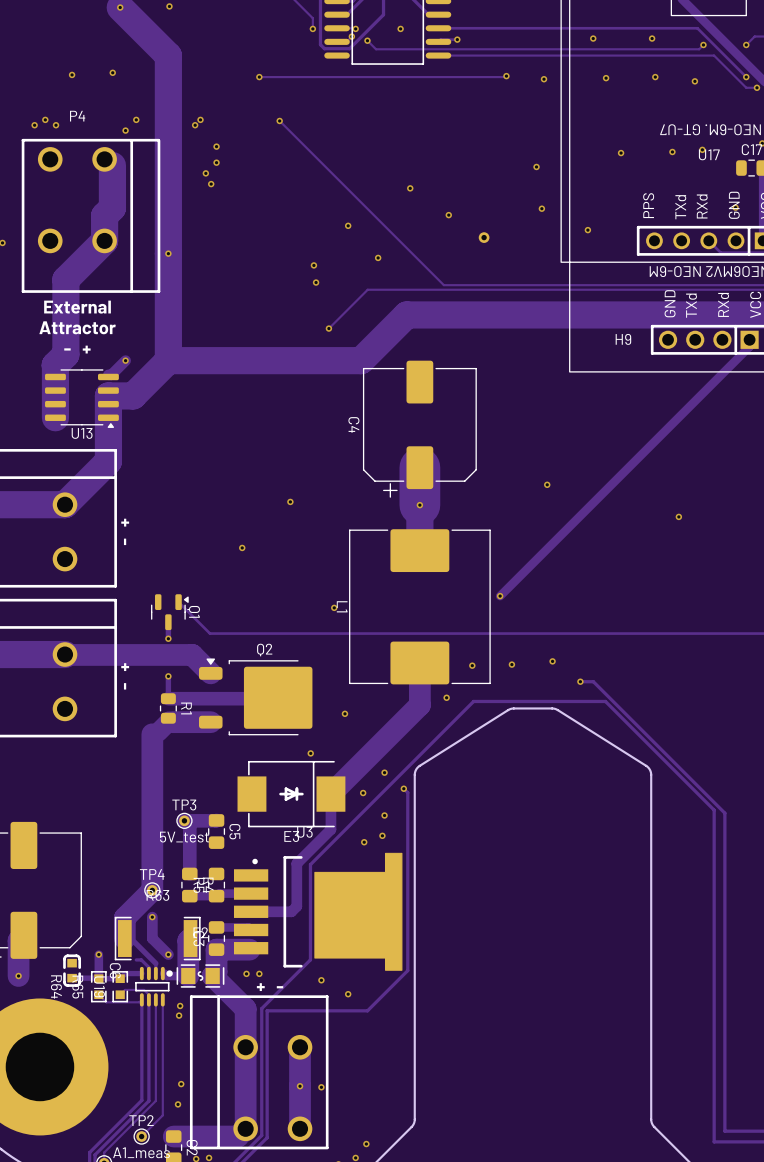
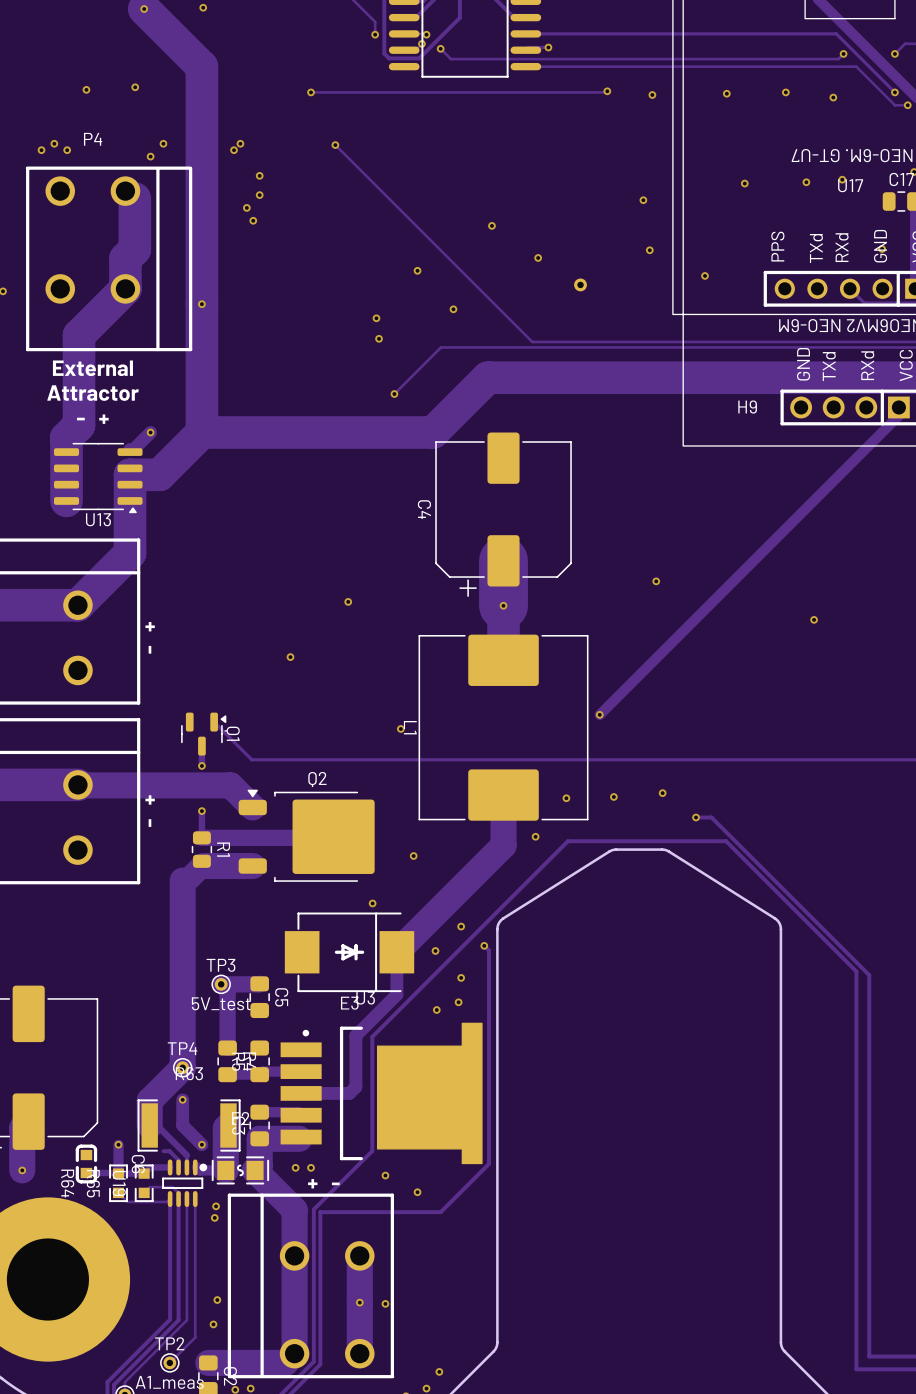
via: (400, 28) -> none
via: (593, 38) -> none
via: (652, 38) -> none

